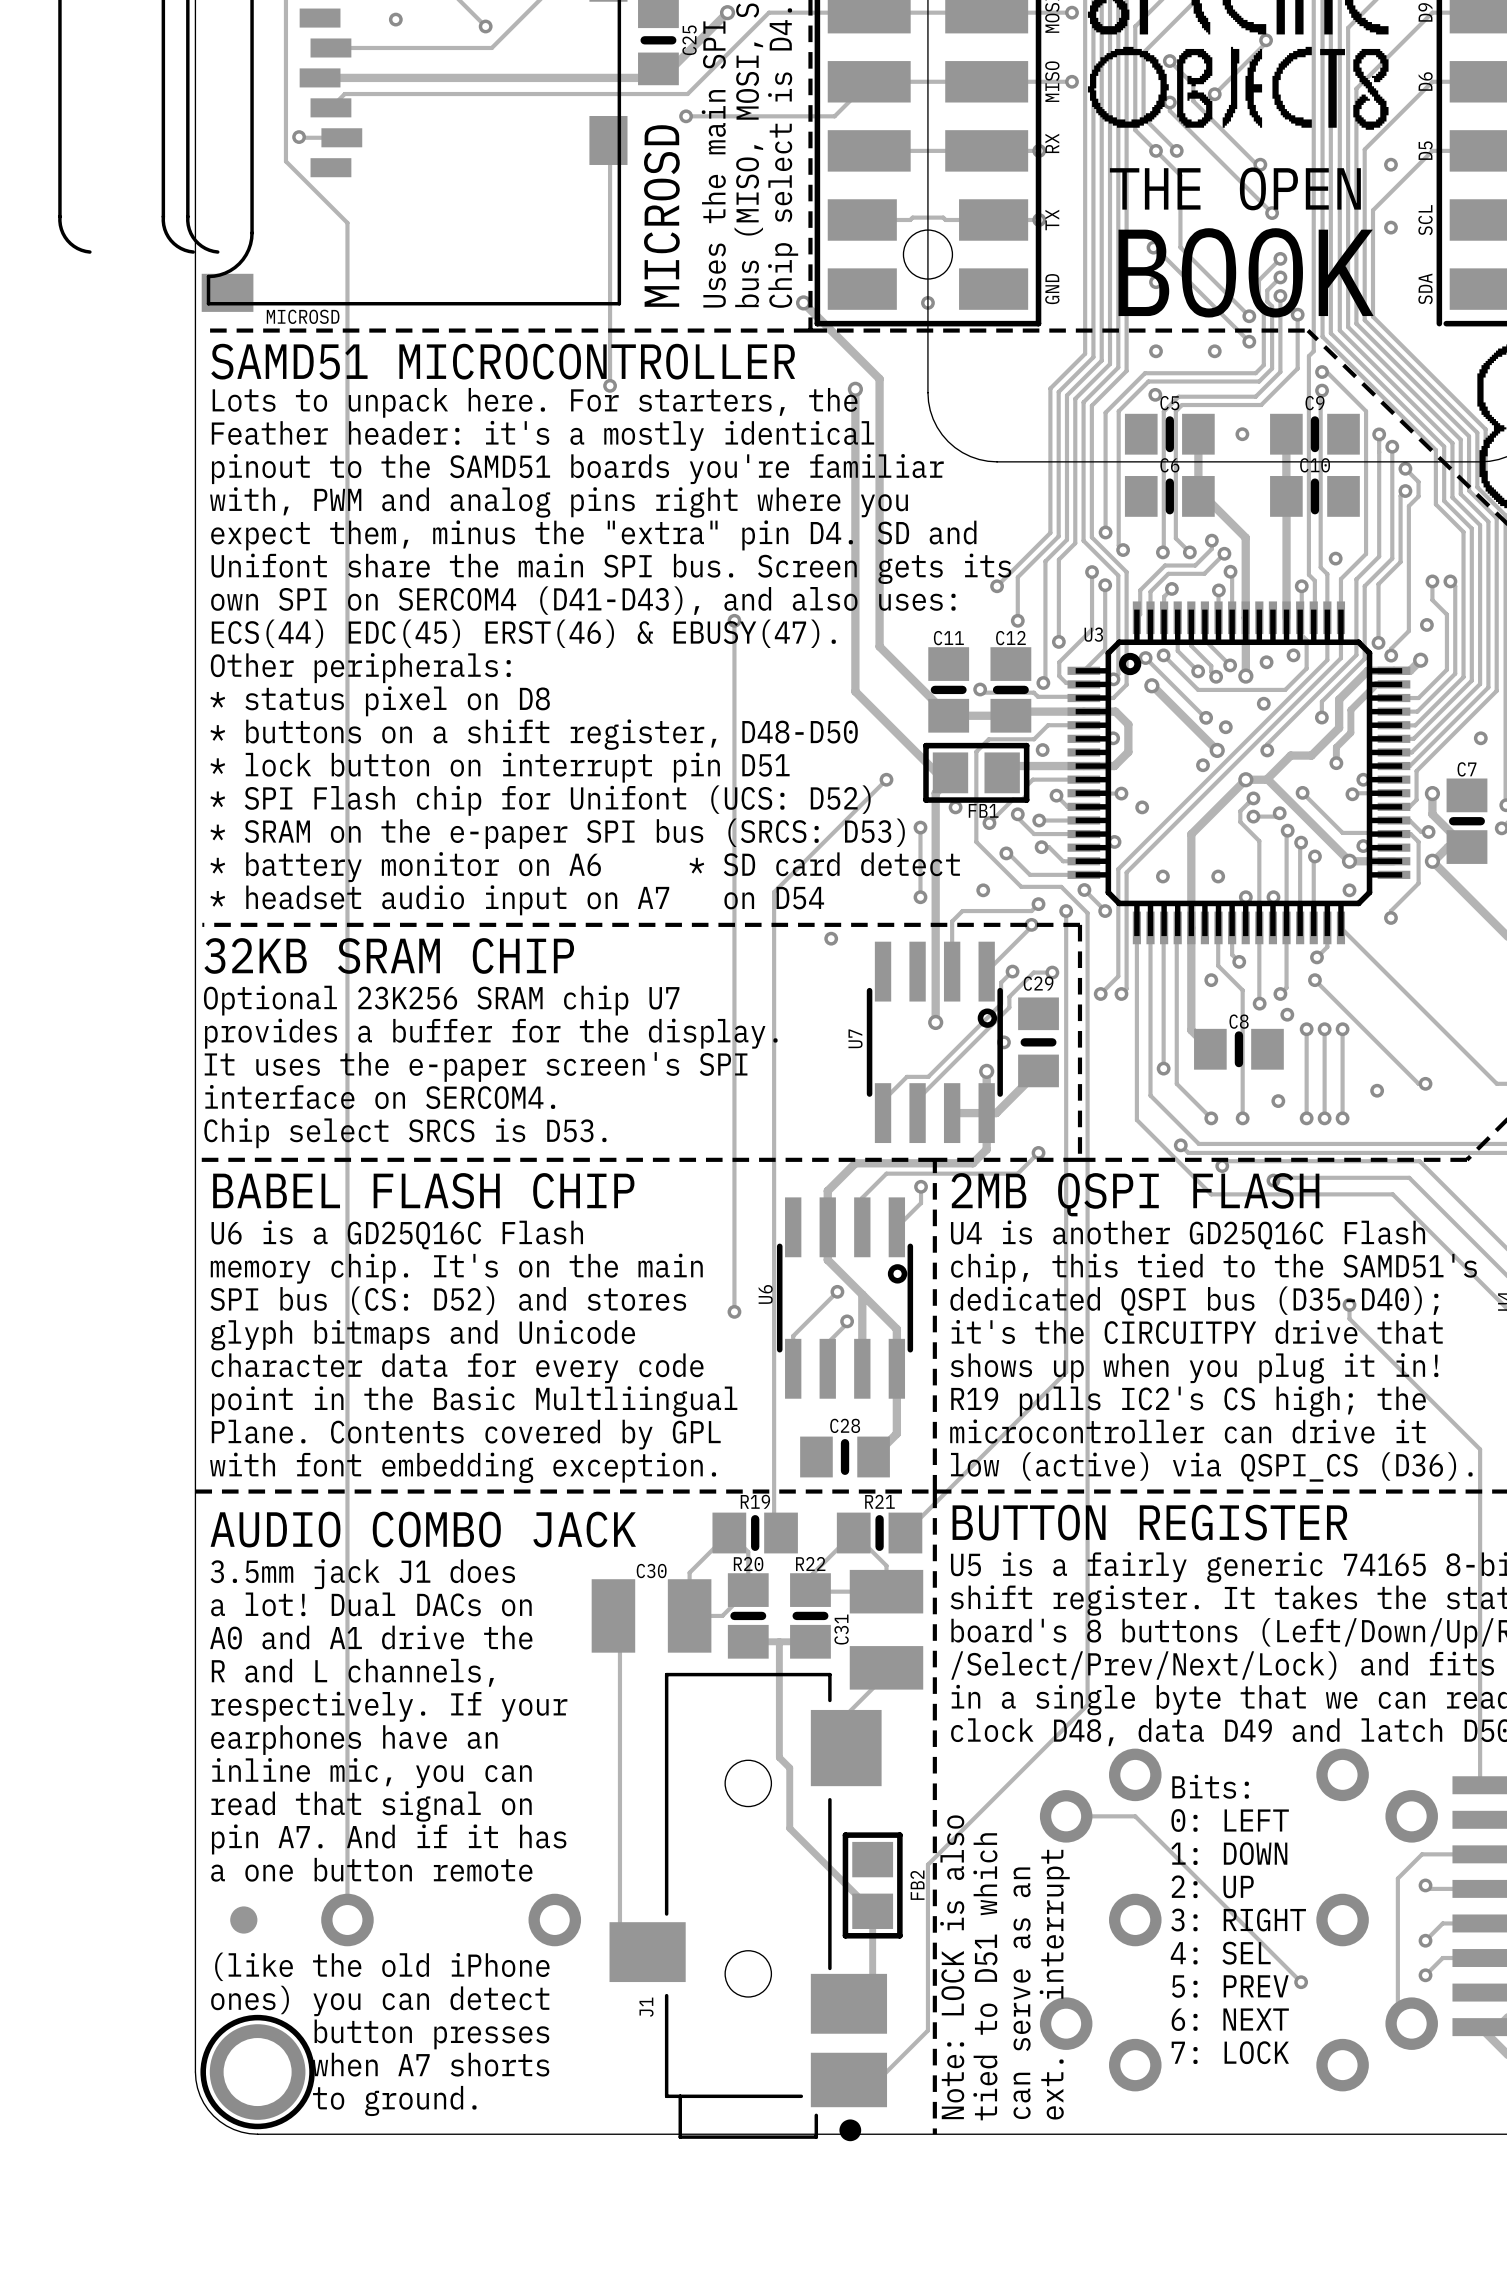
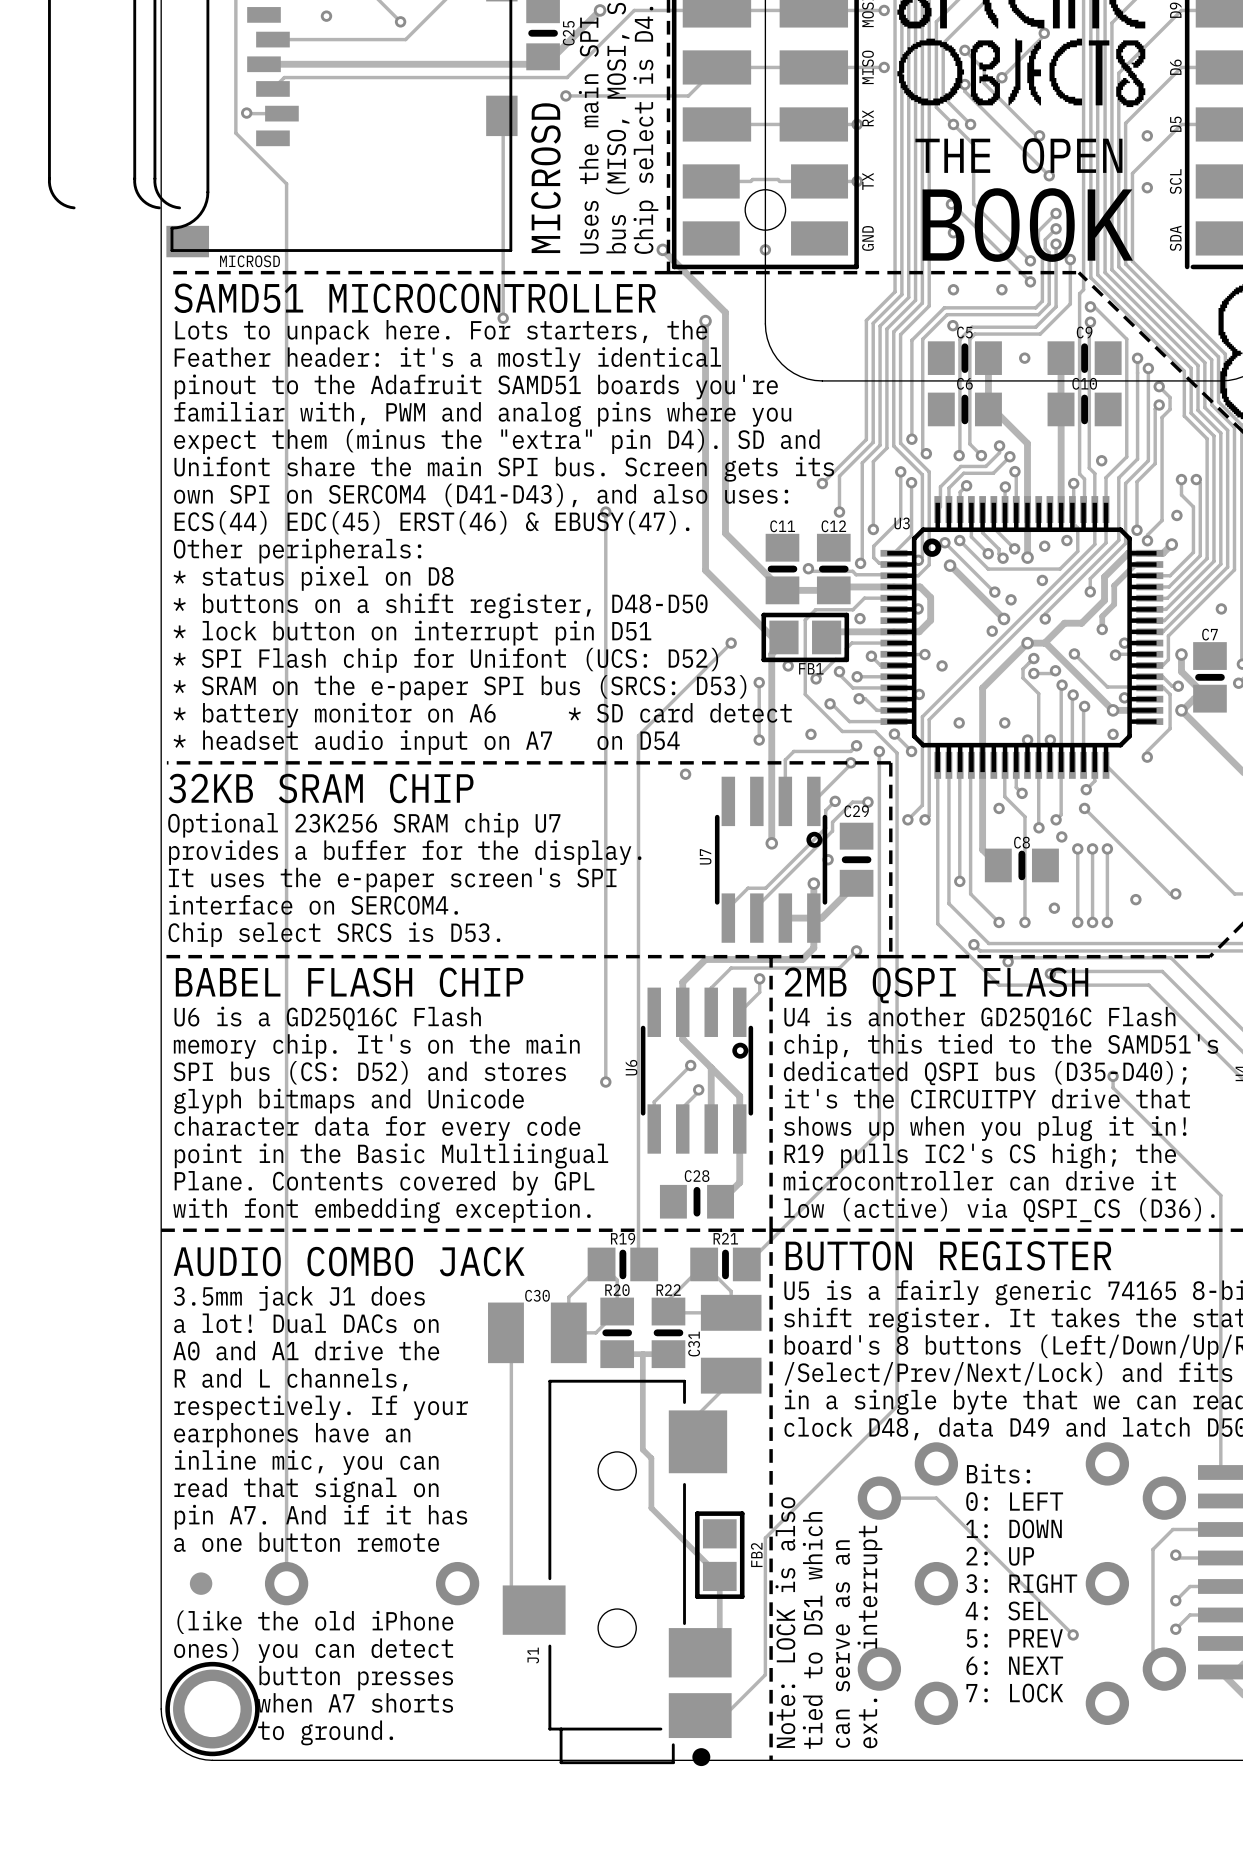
text: pinout to the SAMD51 boards you're familiar (577, 469) -> pinout to the Adafruit SAMD51 boards you're (476, 386)
text: with, PWM and analog pins right where you (559, 502) -> familiar with, PWM and analog pins where you (482, 414)
text: expect them, minus the "extra" pin D4. SD and (593, 535) -> expect them (minus the "extra" pin D4). SD and (496, 441)

